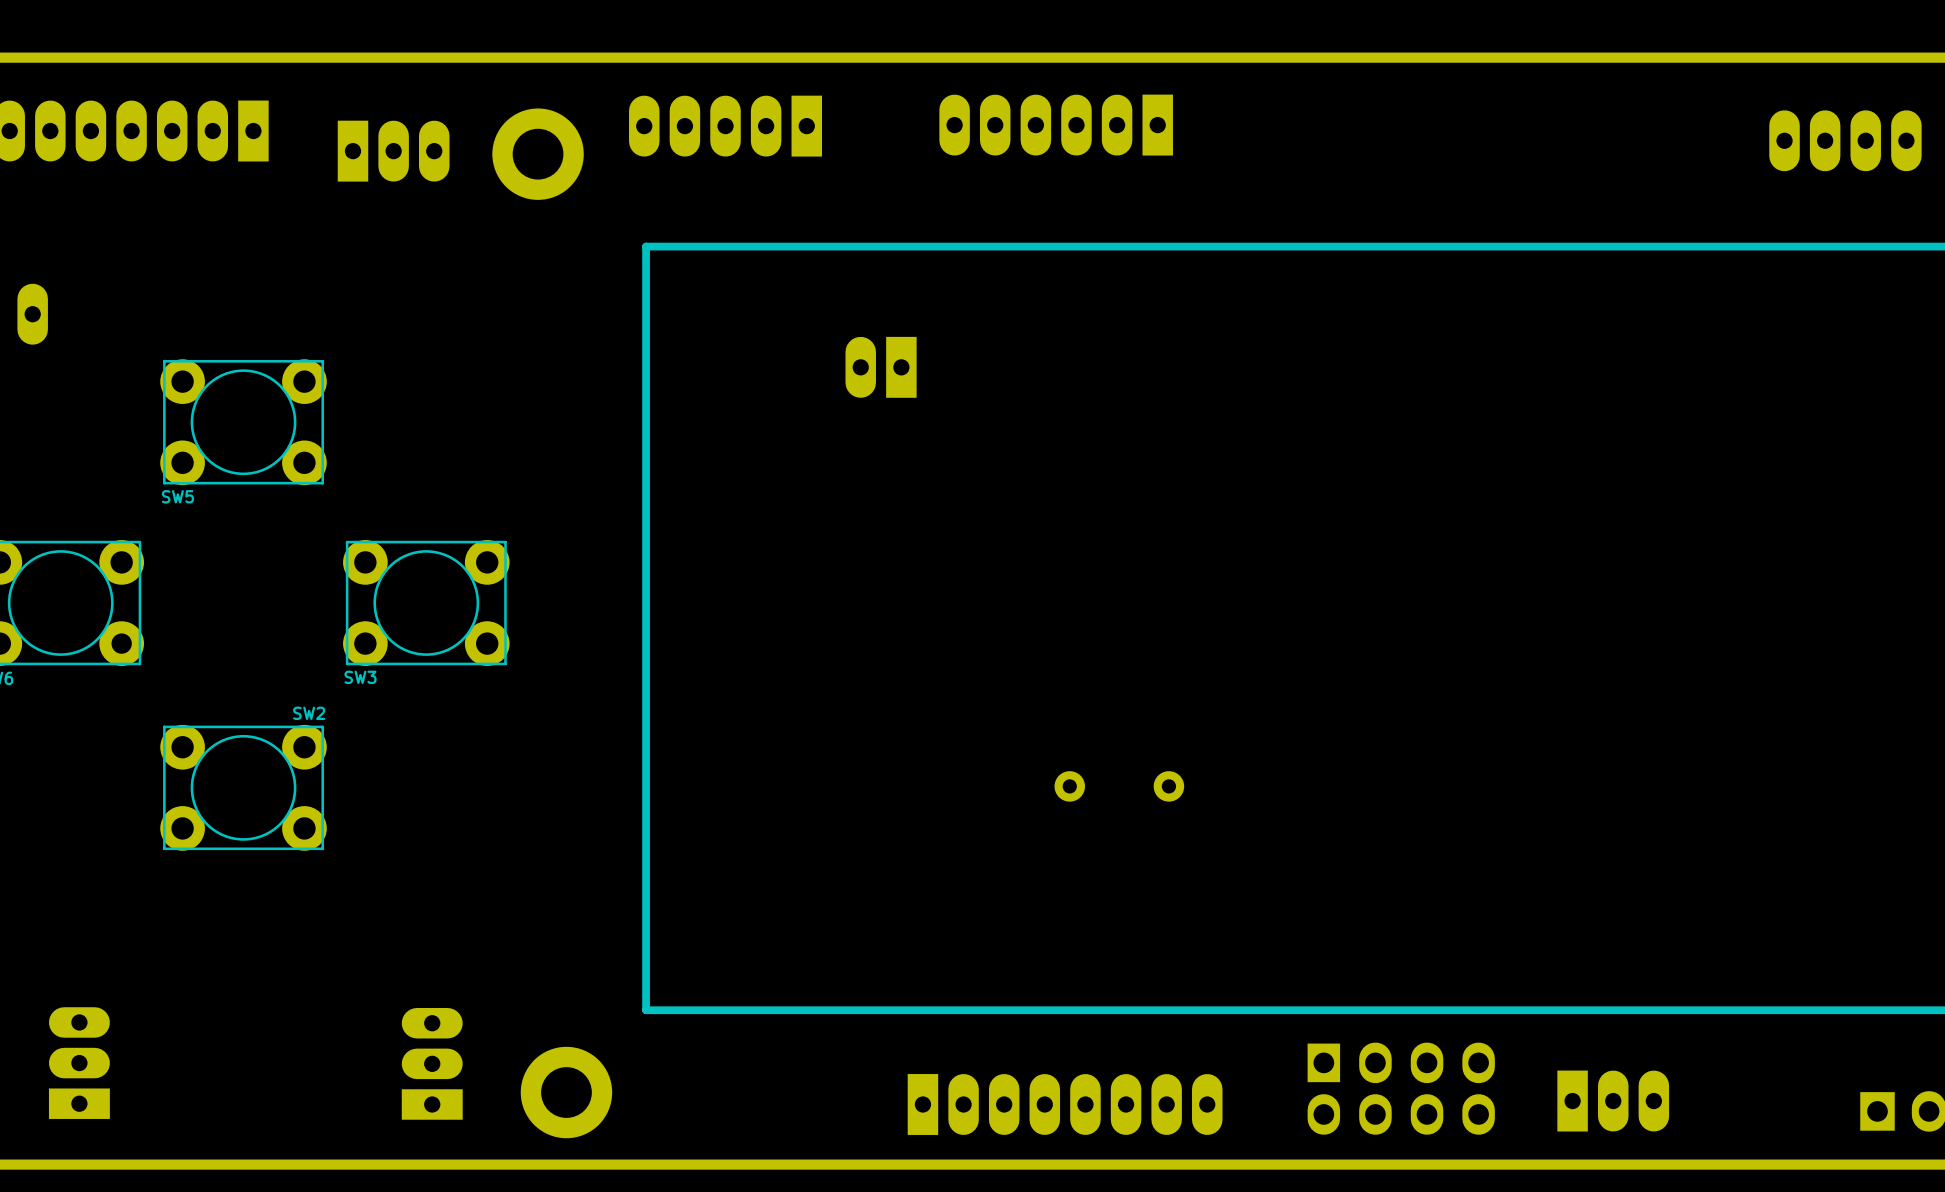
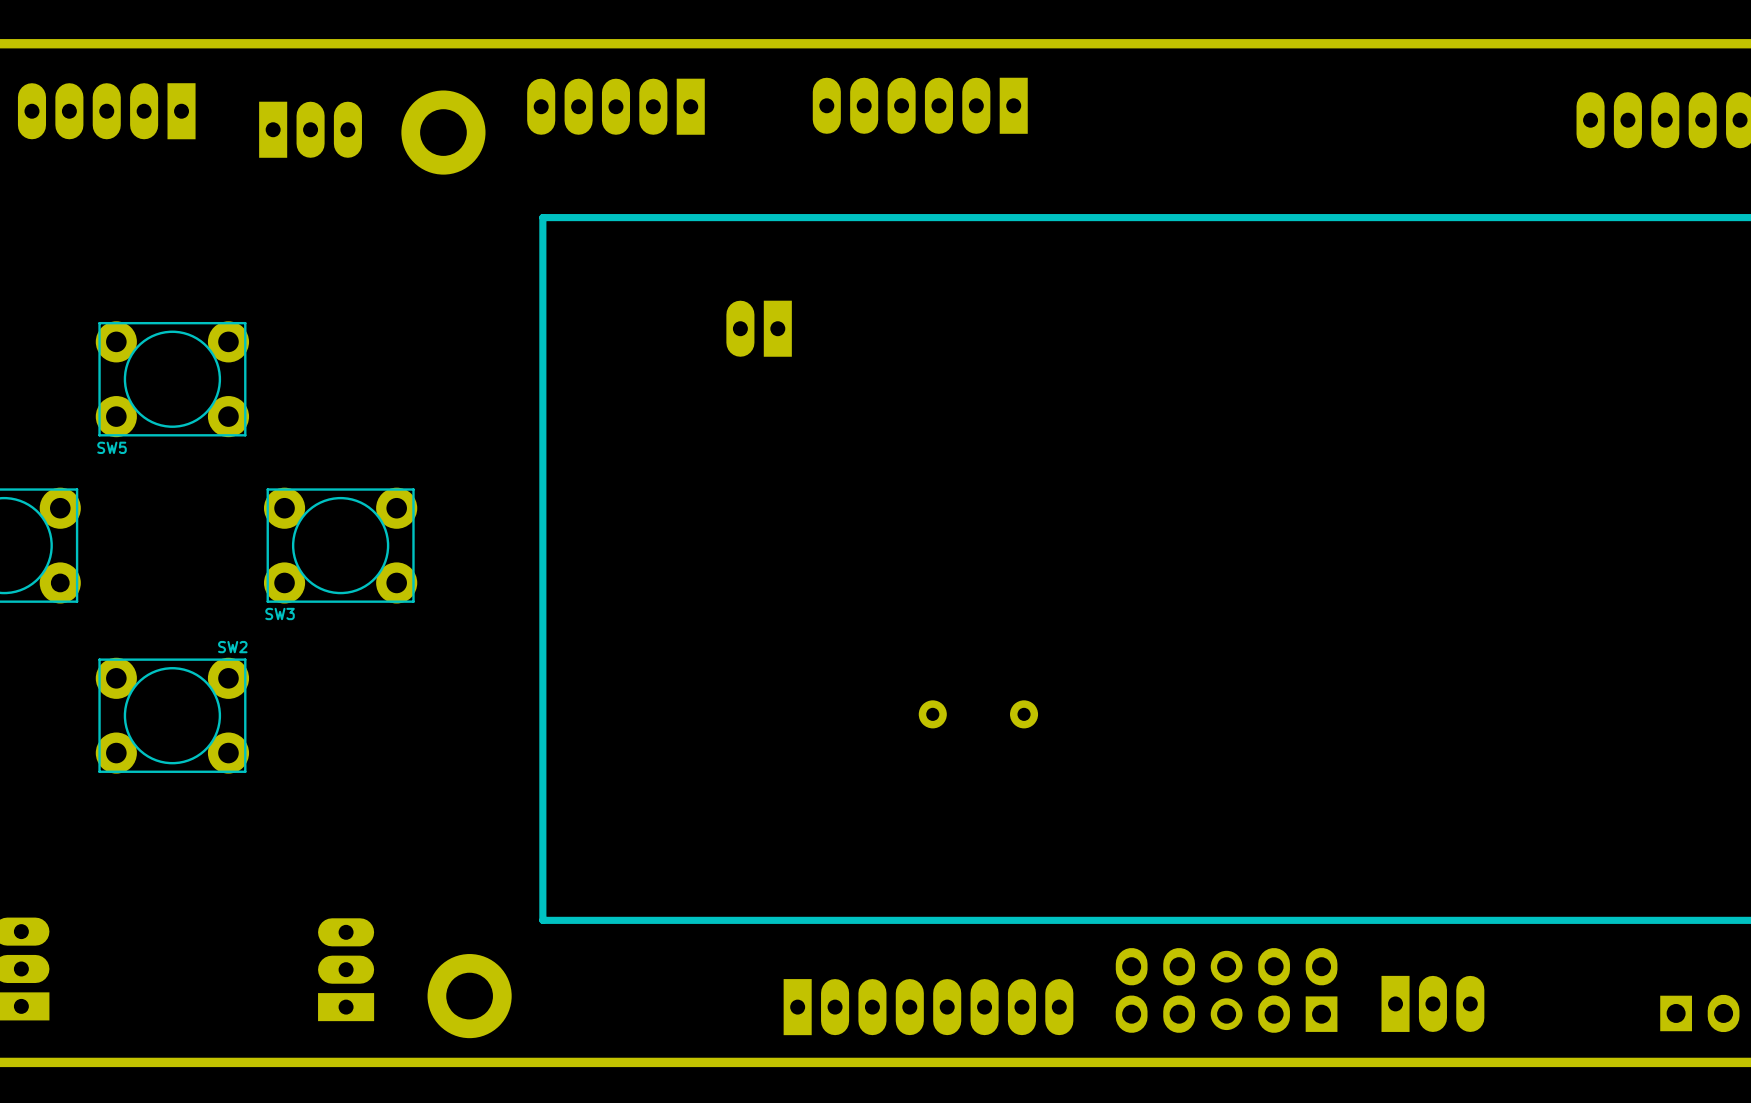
part footprint: [1307, 1042, 1495, 1135] -> [1115, 948, 1338, 1033]

